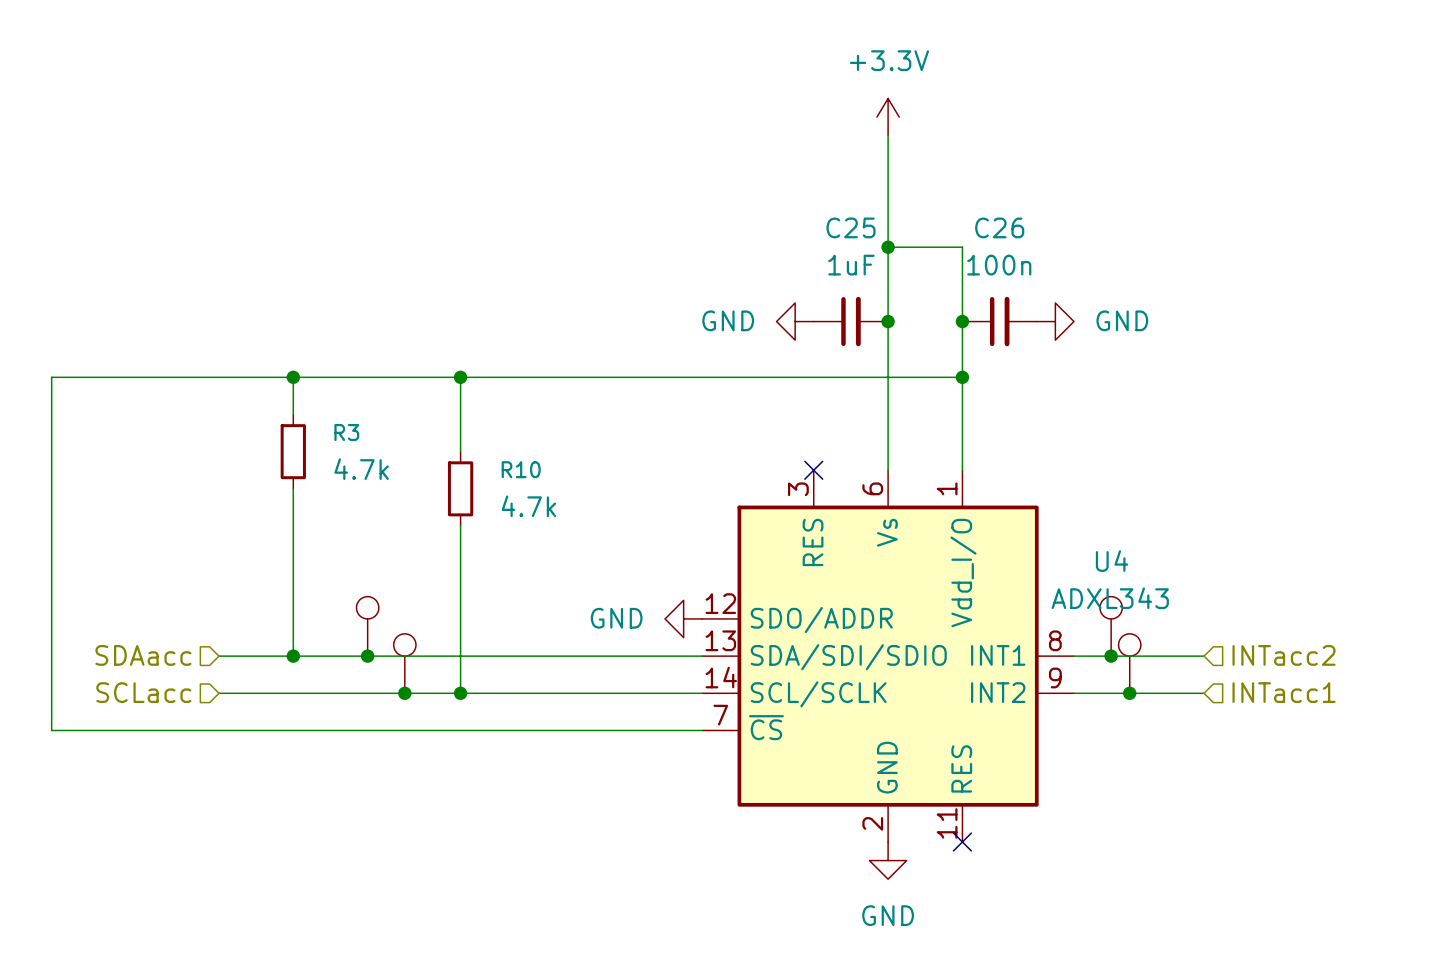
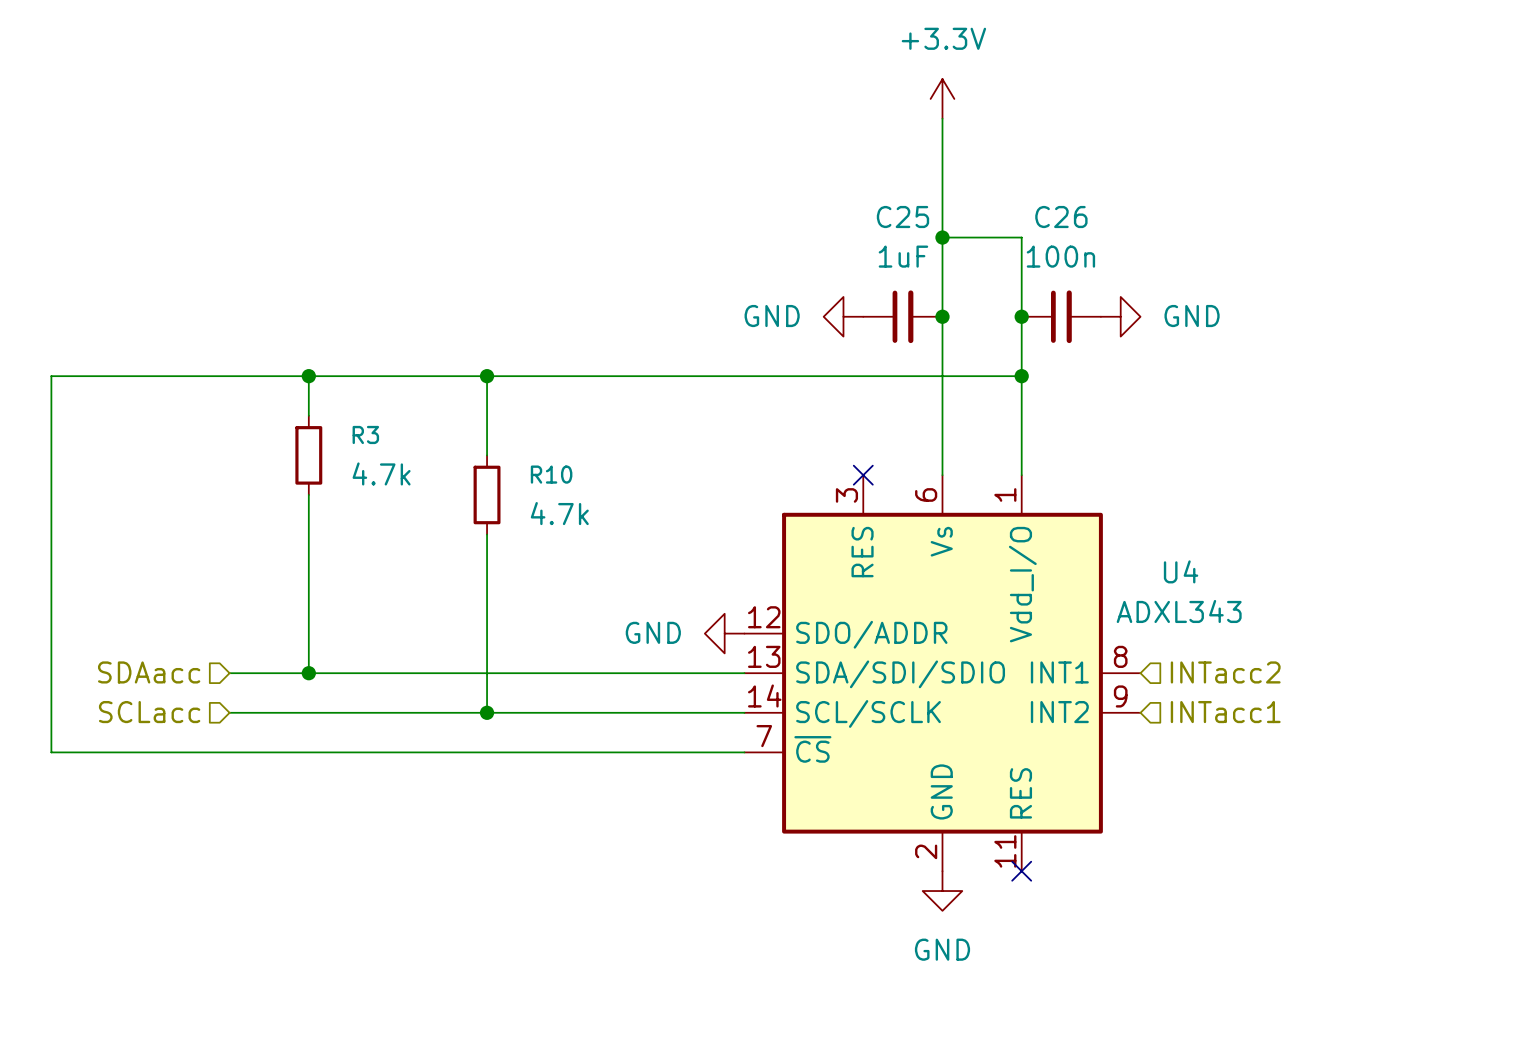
part: (367, 626) -> none
part: (1111, 626) -> none
hierarchical label position: INTacc2 (1284, 655) -> INTacc2 (1225, 672)
junction: (367, 656) -> none
wire: (1073, 656) (1204, 656) -> none
junction: (1111, 656) -> none
part: (404, 663) -> none
part: (1129, 663) -> none
hierarchical label position: INTacc1 (1284, 692) -> INTacc1 (1225, 712)
junction: (404, 693) -> none
wire: (1073, 693) (1204, 693) -> none
junction: (1129, 693) -> none

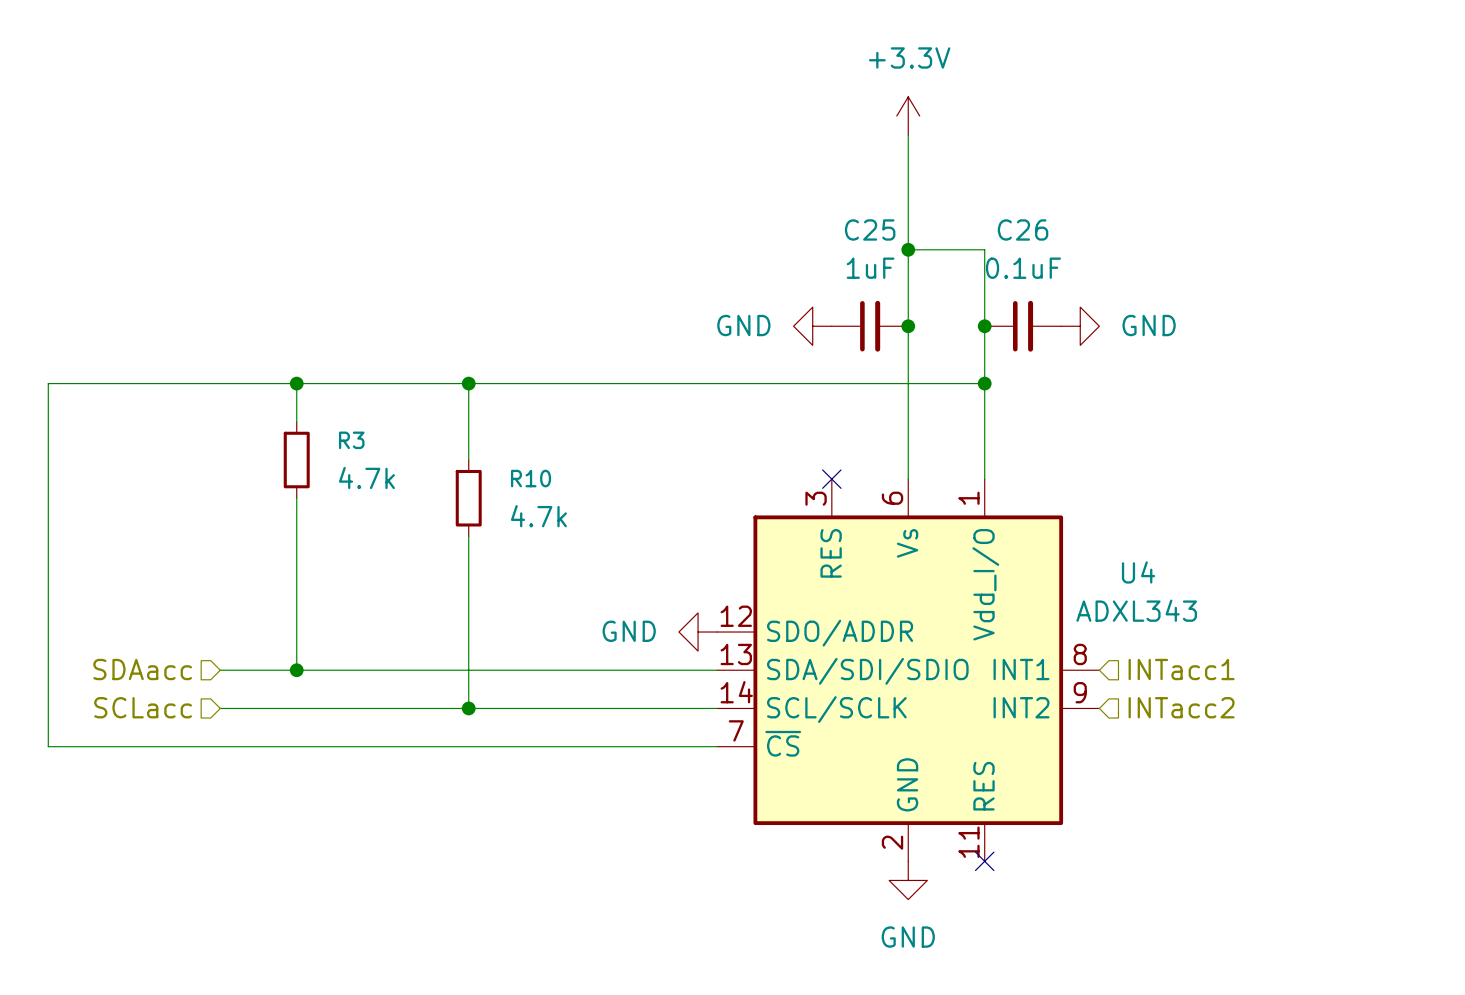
C26 value: 100n (1060, 256) -> 0.1uF (1023, 268)
hierarchical label: INTacc2 (1225, 672) -> INTacc1 (1181, 669)
hierarchical label: INTacc1 (1225, 712) -> INTacc2 (1181, 707)

